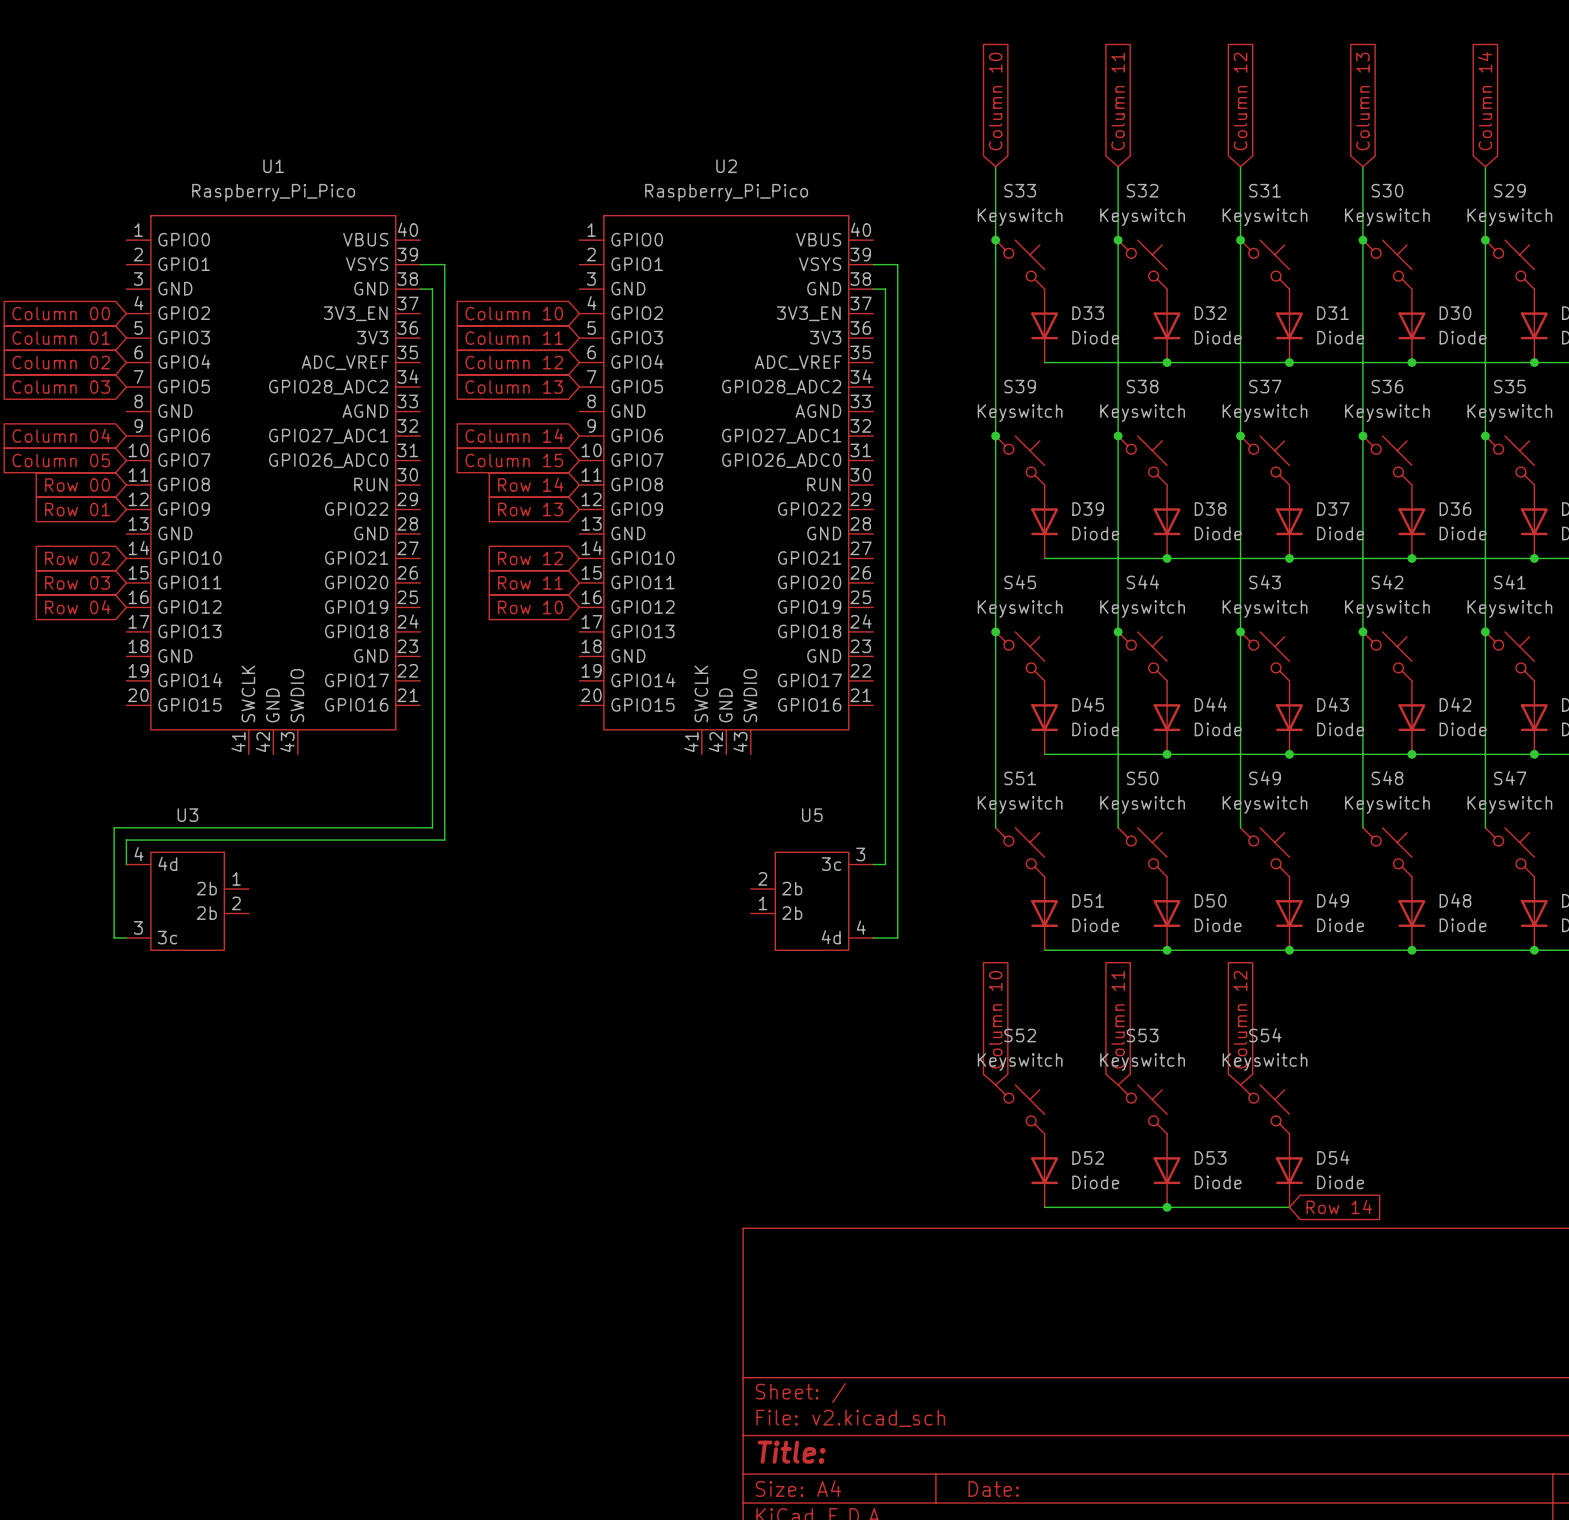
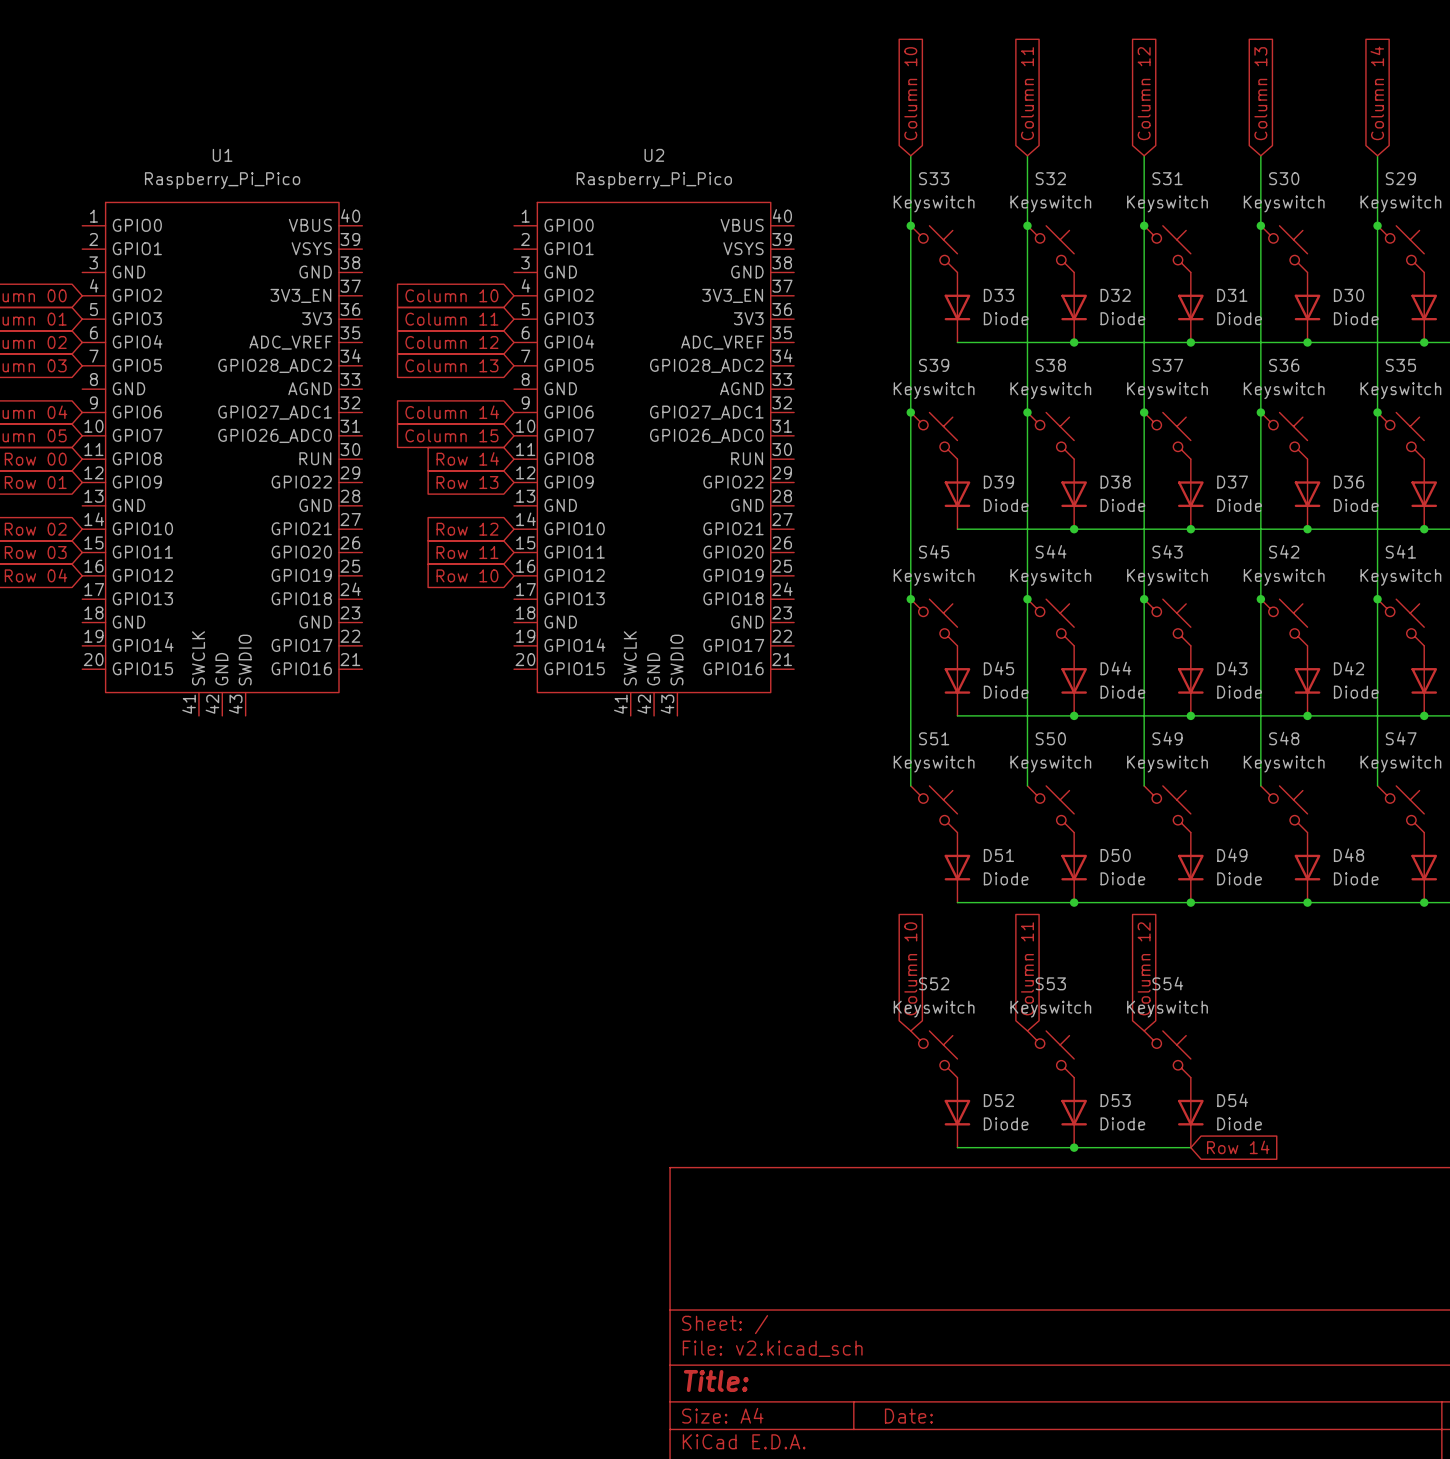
wire: (420, 264) (444, 264) (444, 840) (126, 840) (126, 864) -> none
wire: (873, 264) (897, 264) (897, 938) (873, 938) -> none
wire: (420, 289) (432, 289) (432, 827) (114, 827) (114, 938) (126, 938) -> none
wire: (873, 289) (885, 289) (885, 864) (873, 864) -> none
U3: (187, 901) -> none
U5: (812, 901) -> none

